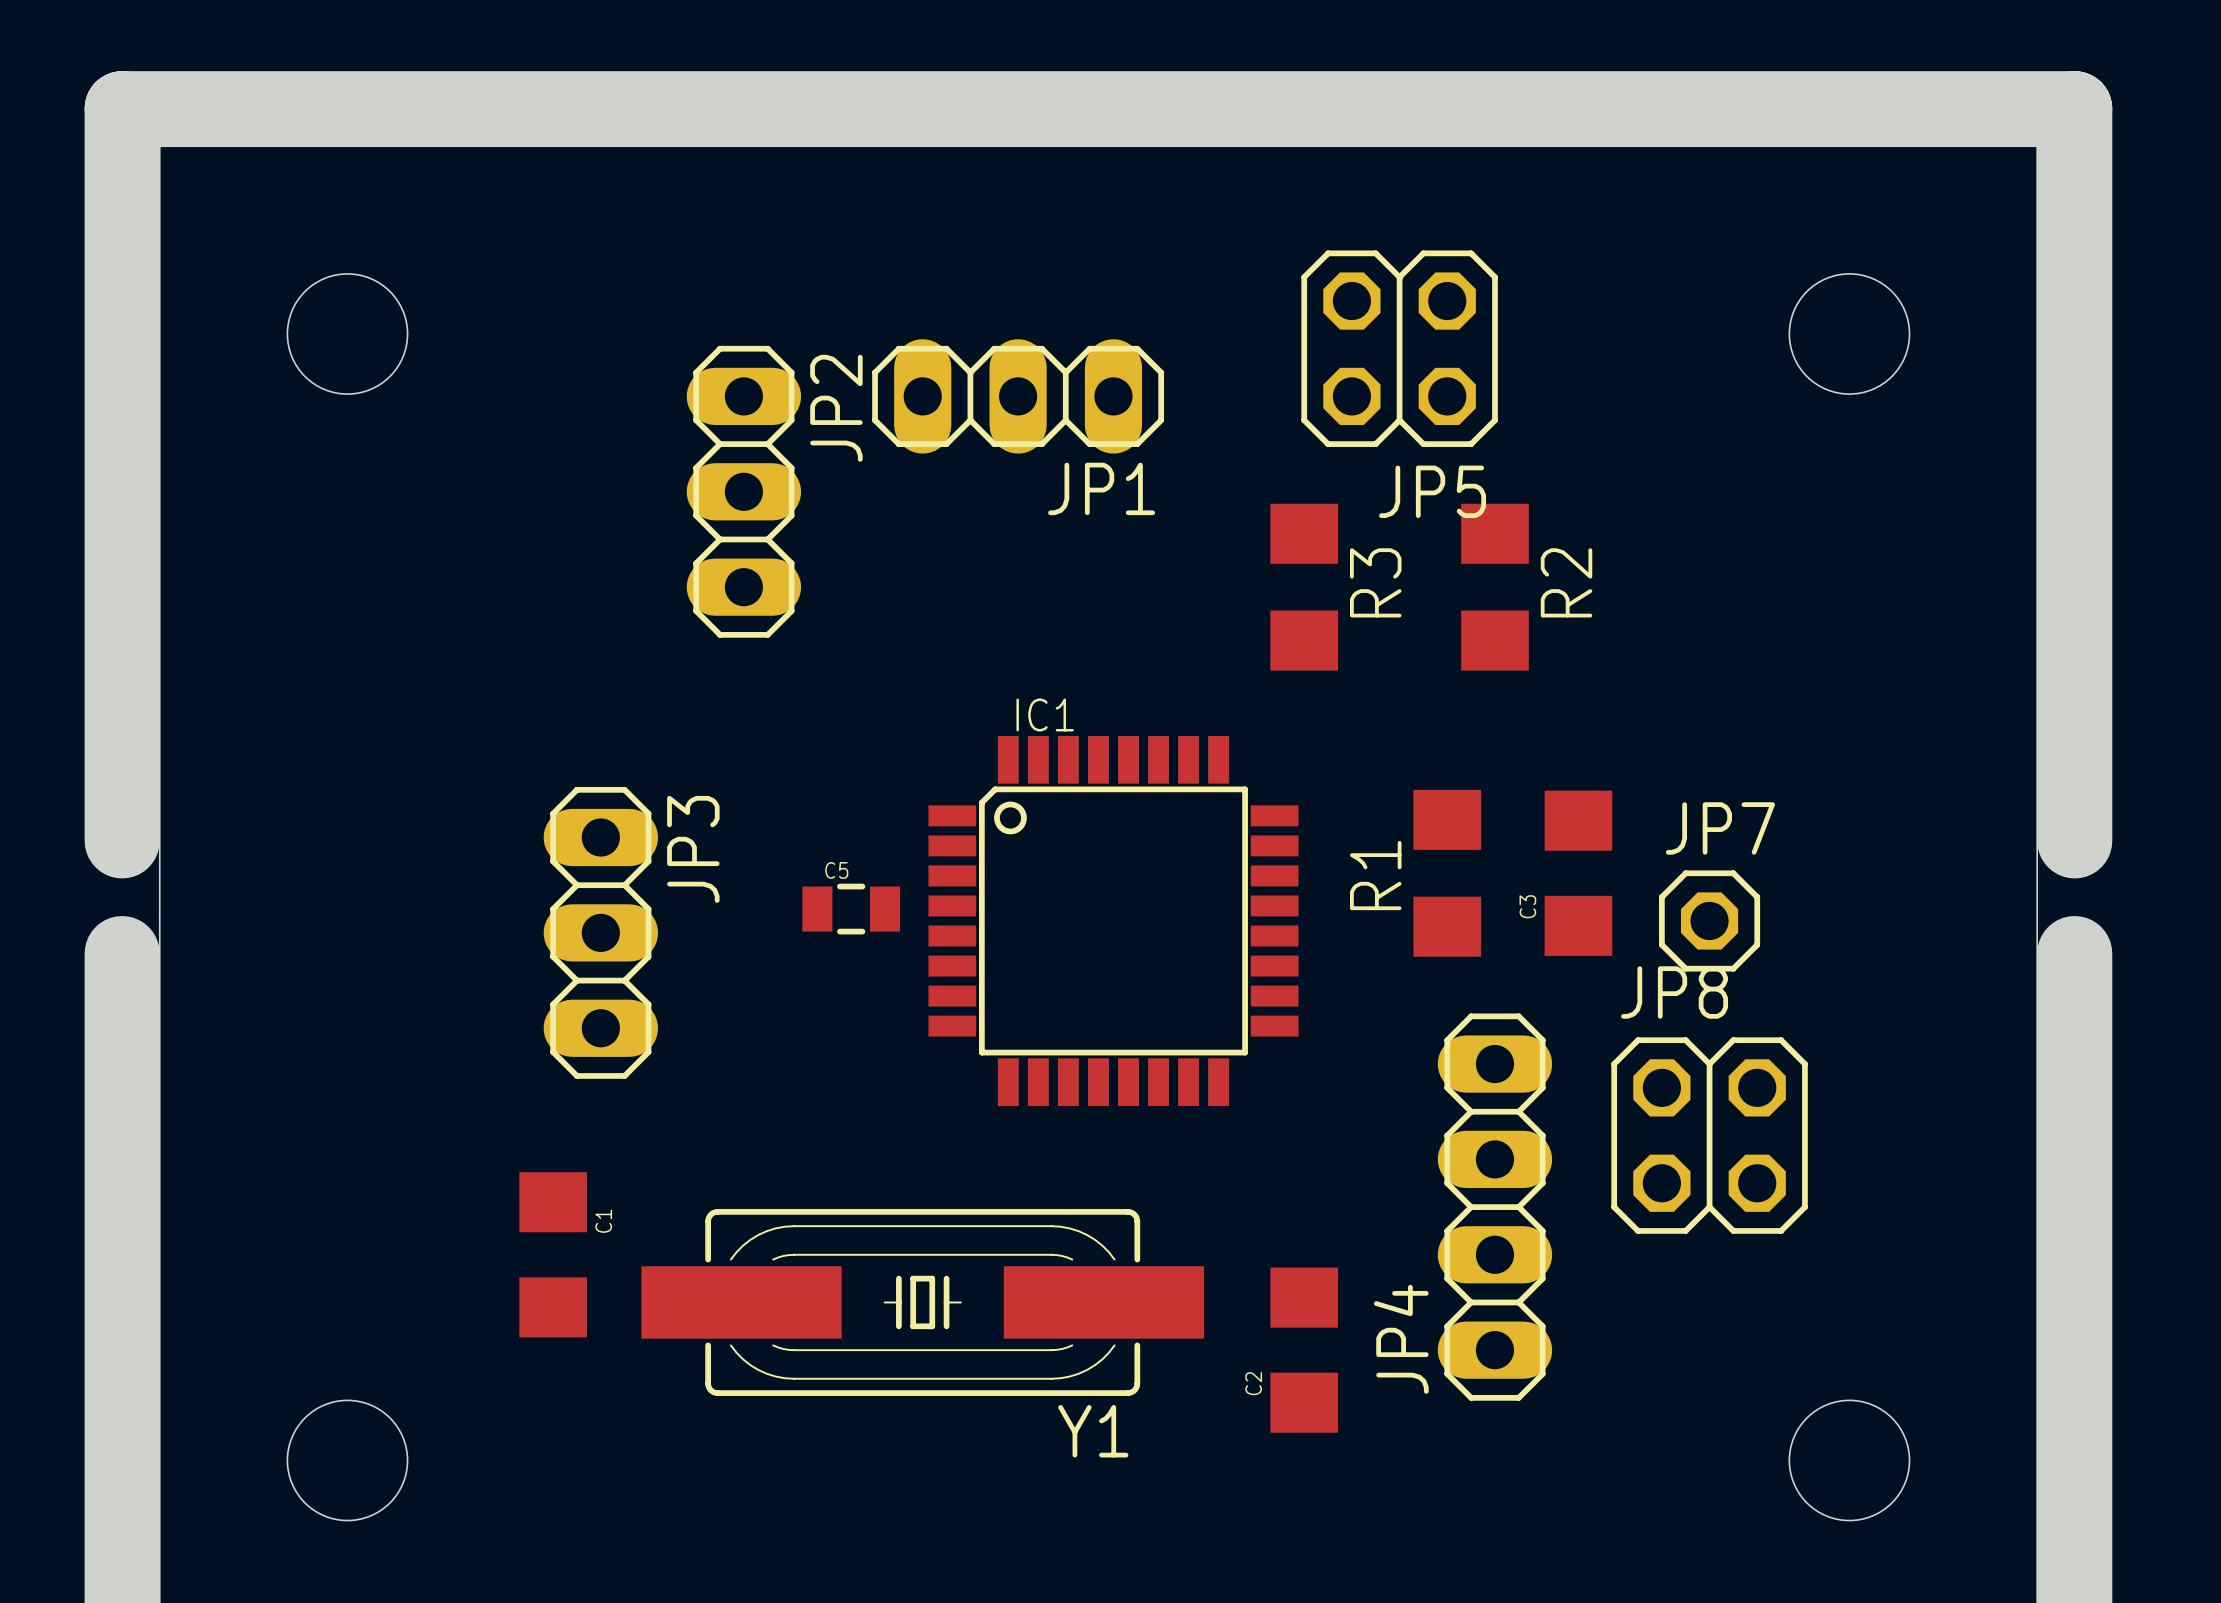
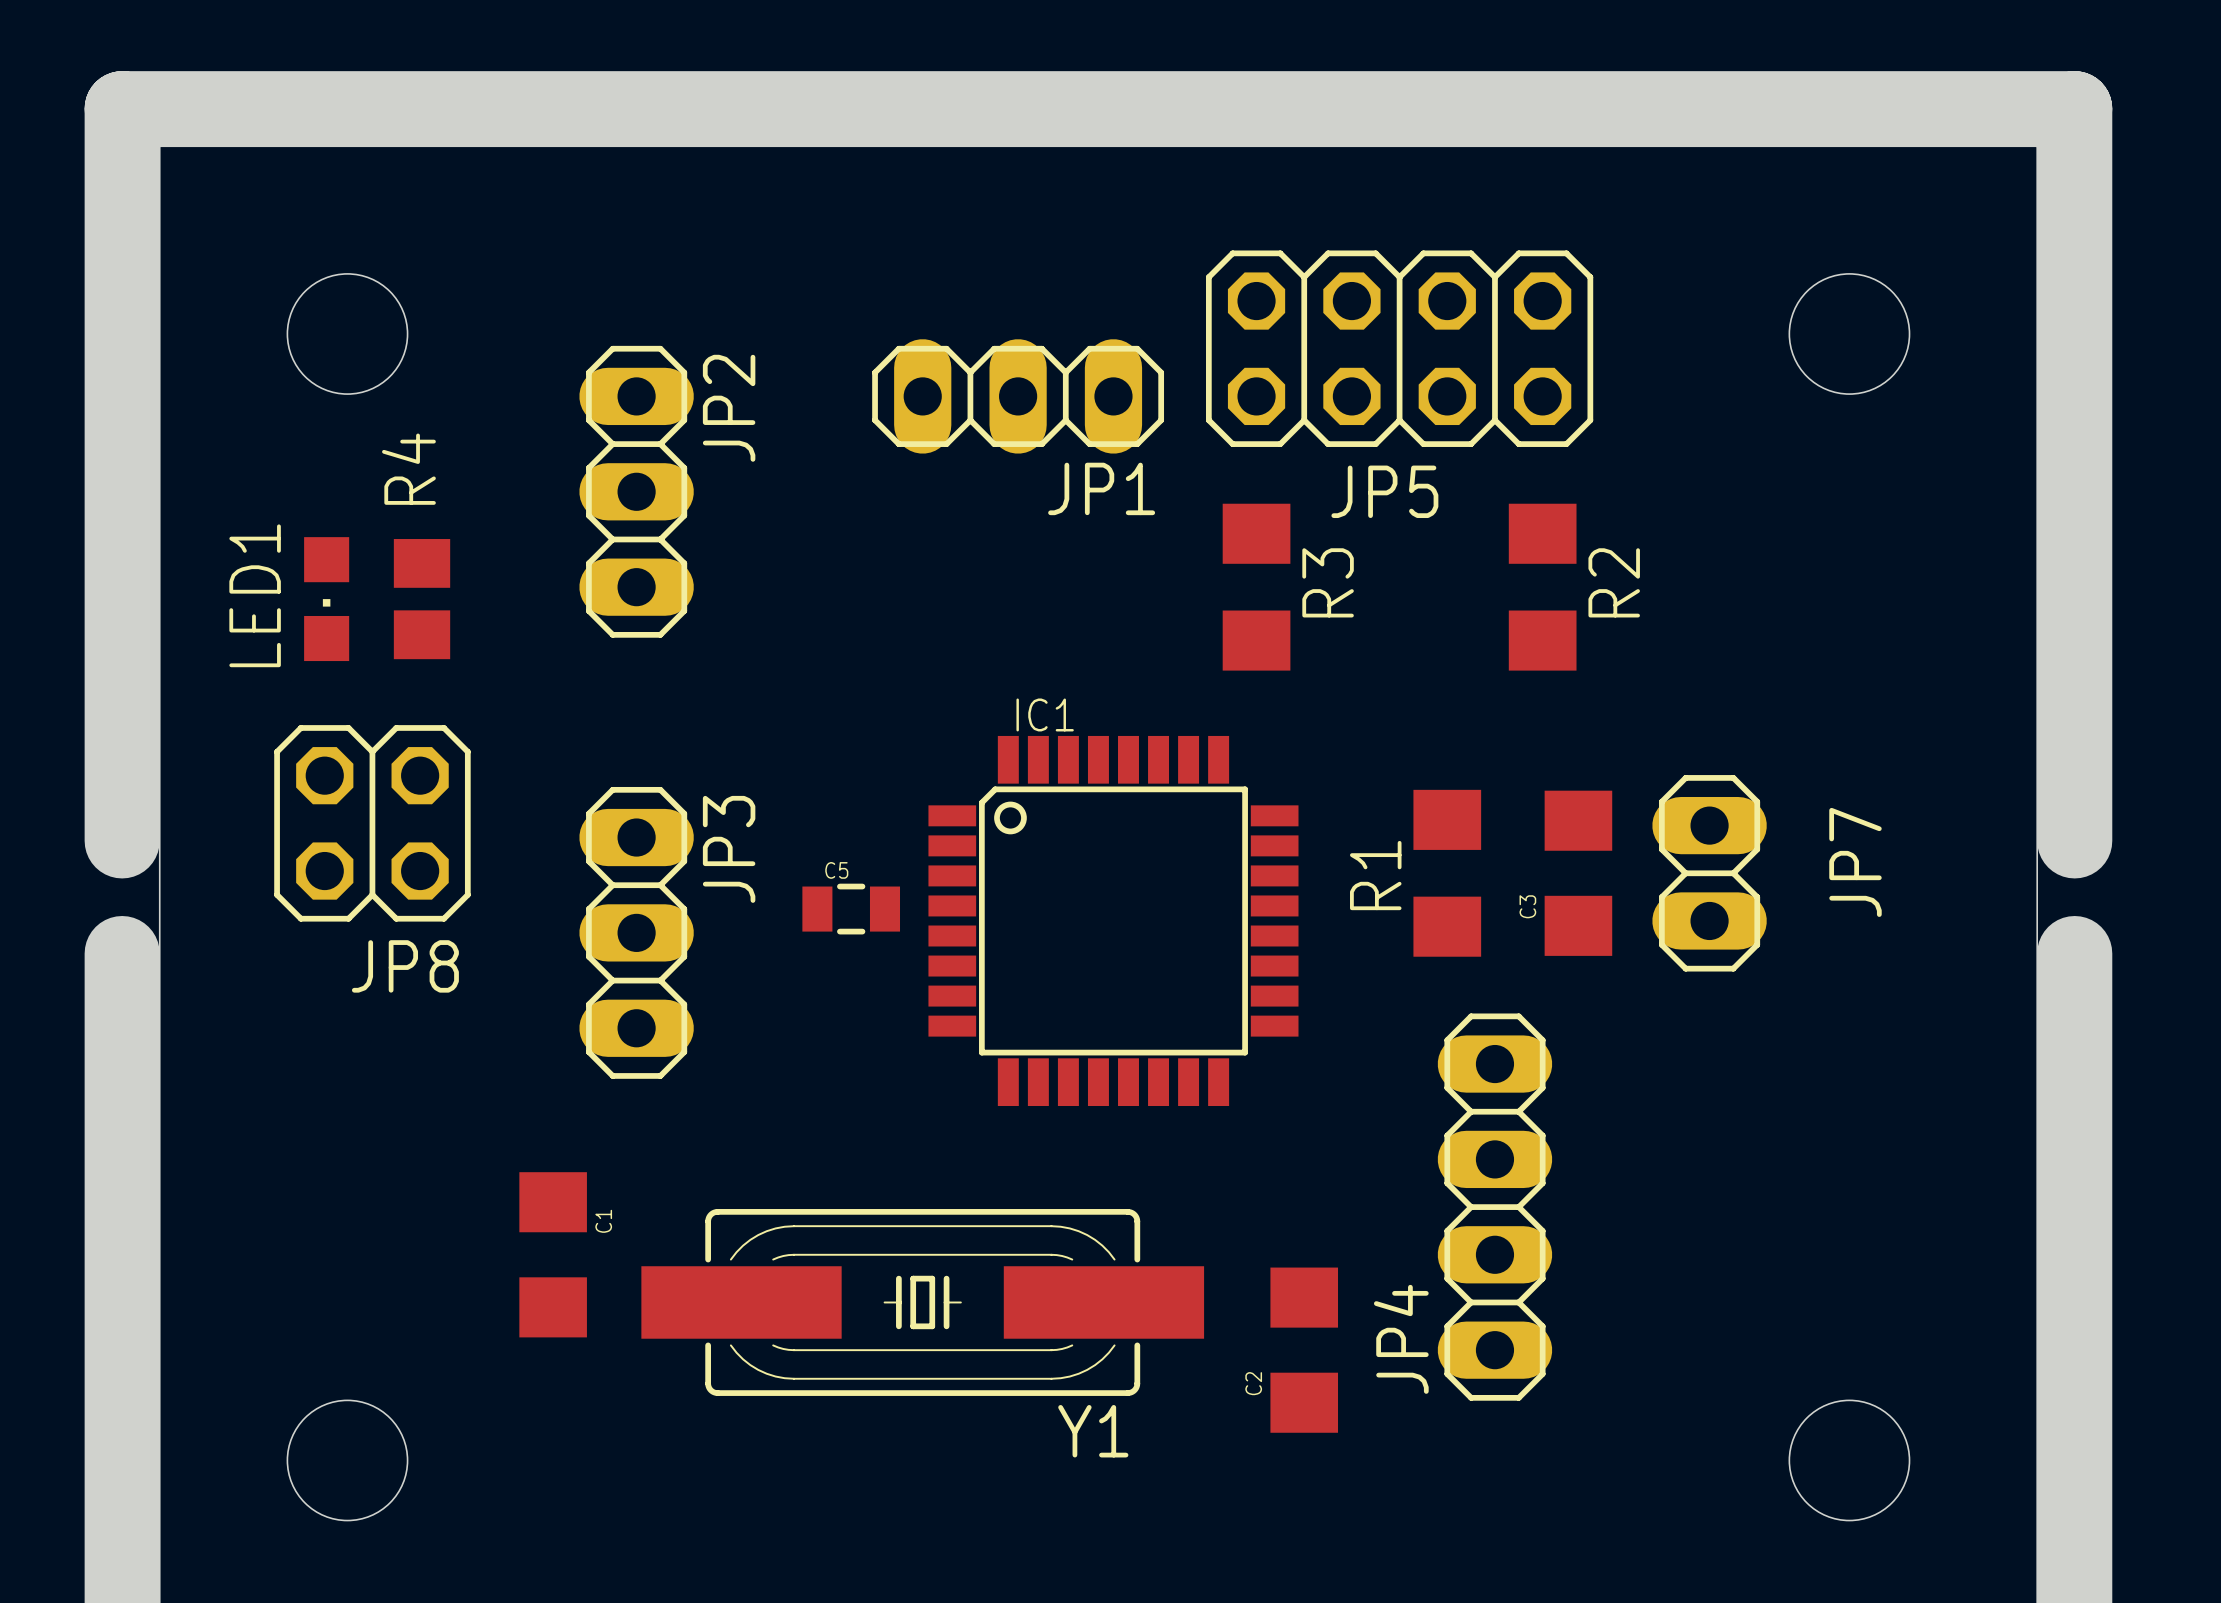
JP5 footprint: [1301, 250, 1498, 447] -> [1205, 250, 1594, 447]
JP2 position: (743, 491) -> (636, 491)
R3 position: (1304, 587) -> (1256, 587)
R2 position: (1494, 587) -> (1542, 587)
LED1: none -> (326, 599)
R4: none -> (422, 599)
JP7 name position: JP7 (1720, 828) -> JP7 (1855, 862)
JP7 footprint: [1659, 870, 1761, 972] -> [1652, 775, 1767, 972]
JP3 position: (600, 932) -> (636, 932)
JP8 name position: JP8 (1674, 992) -> JP8 (405, 966)
JP8 position: (1709, 1135) -> (372, 823)

